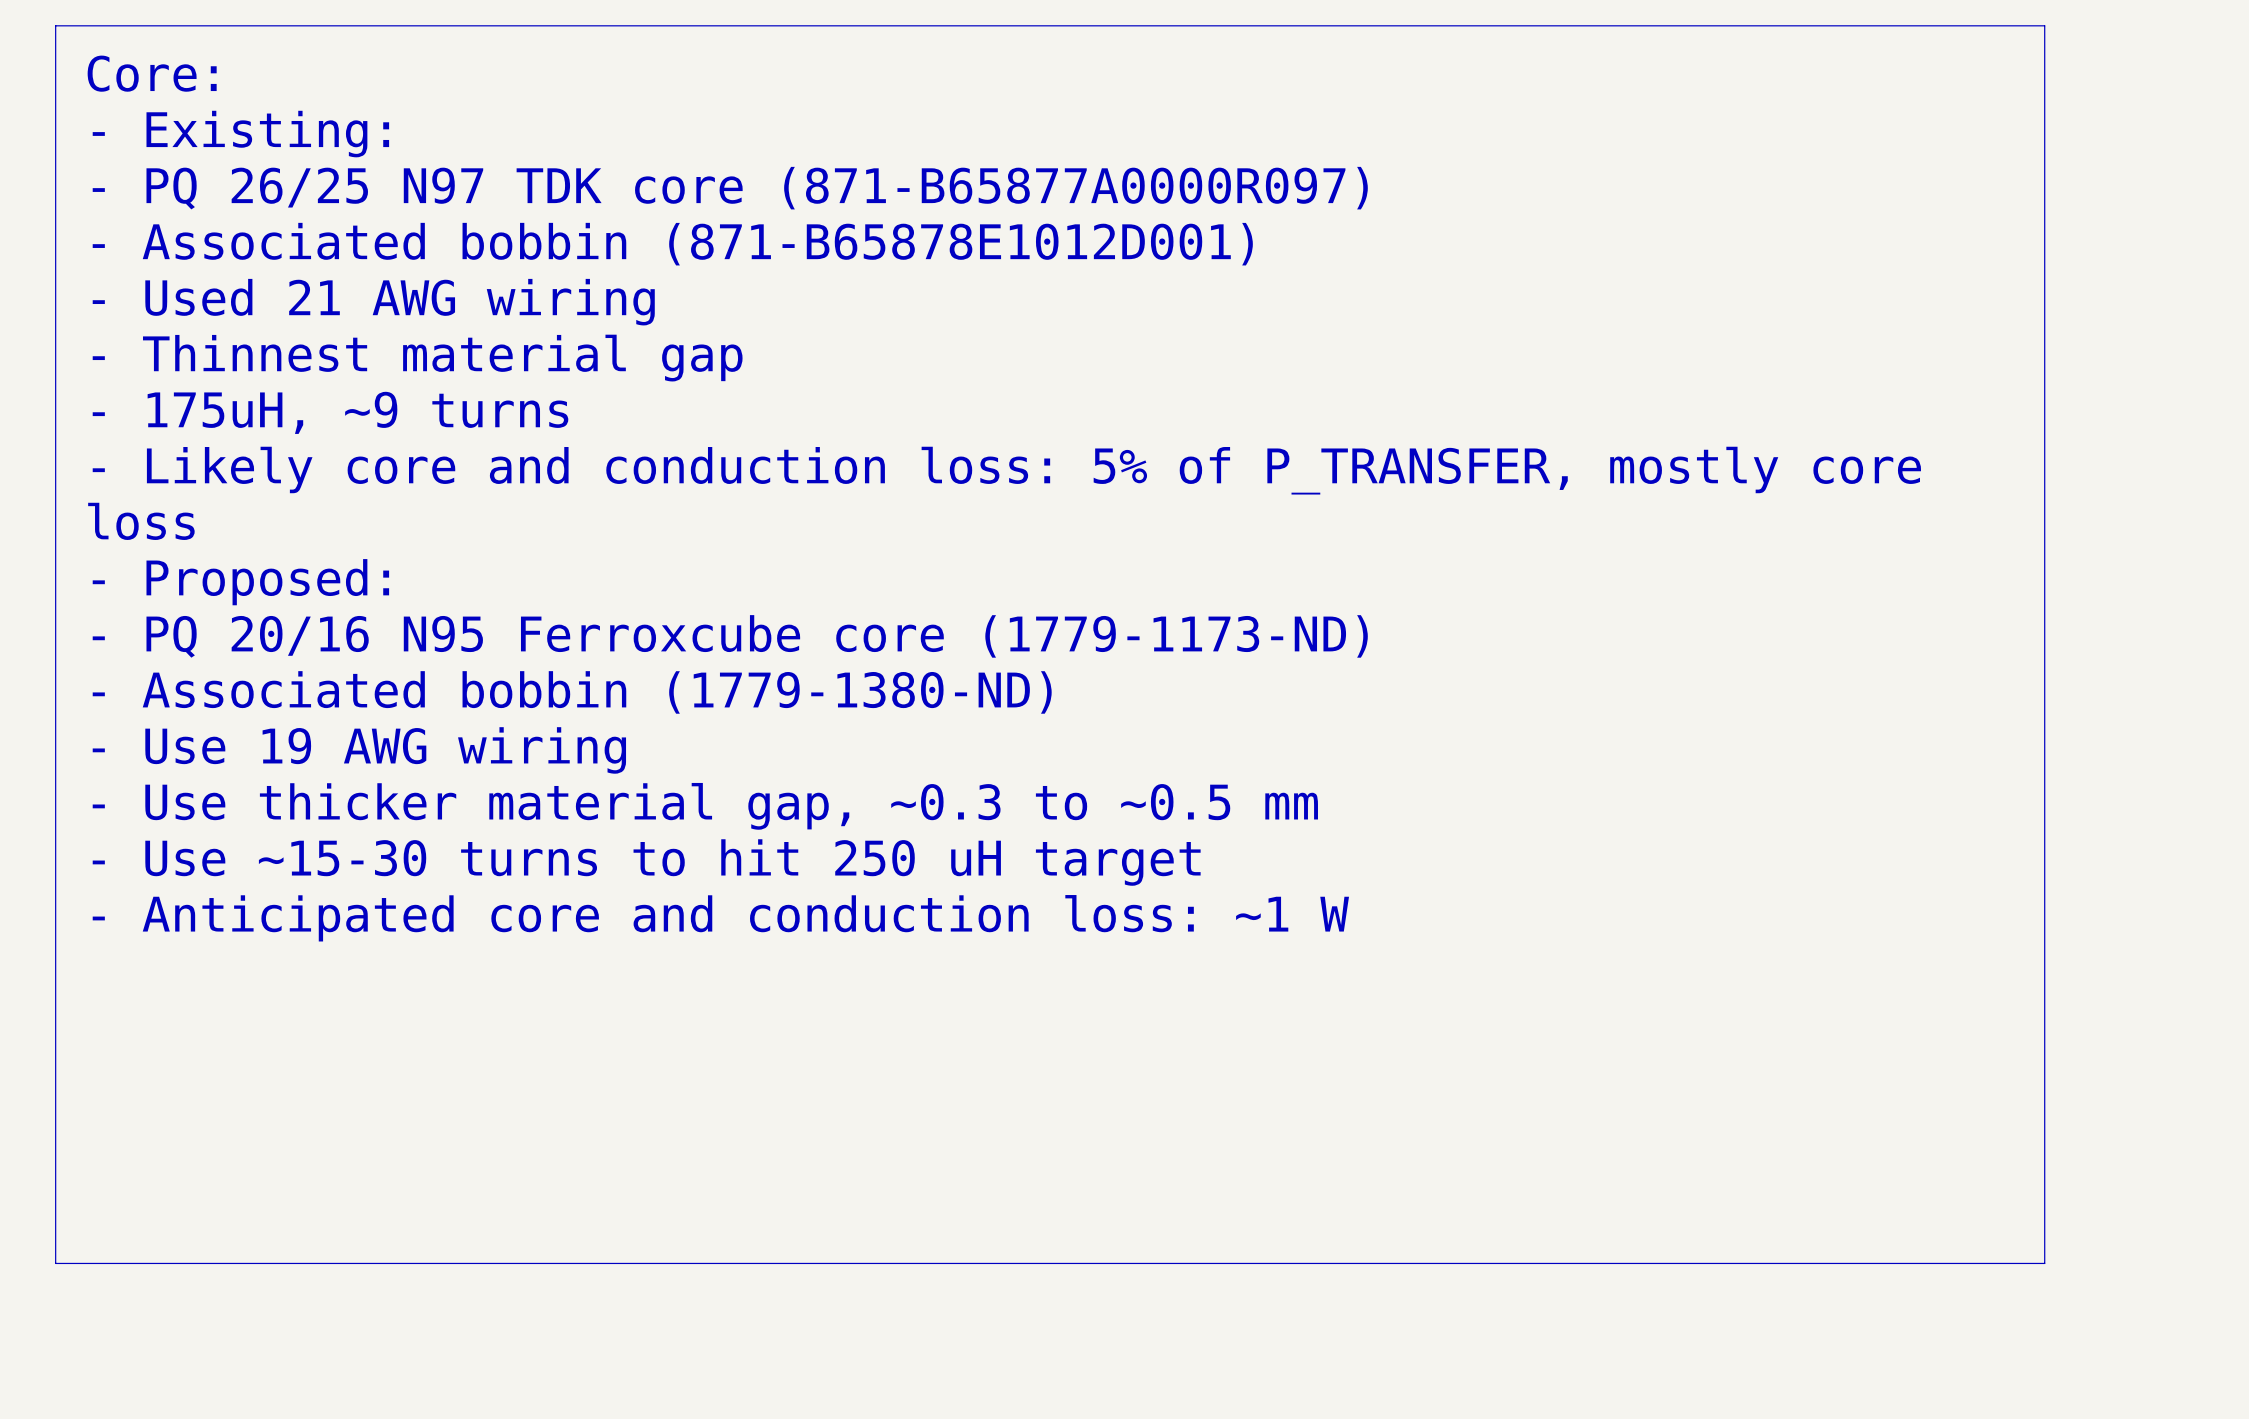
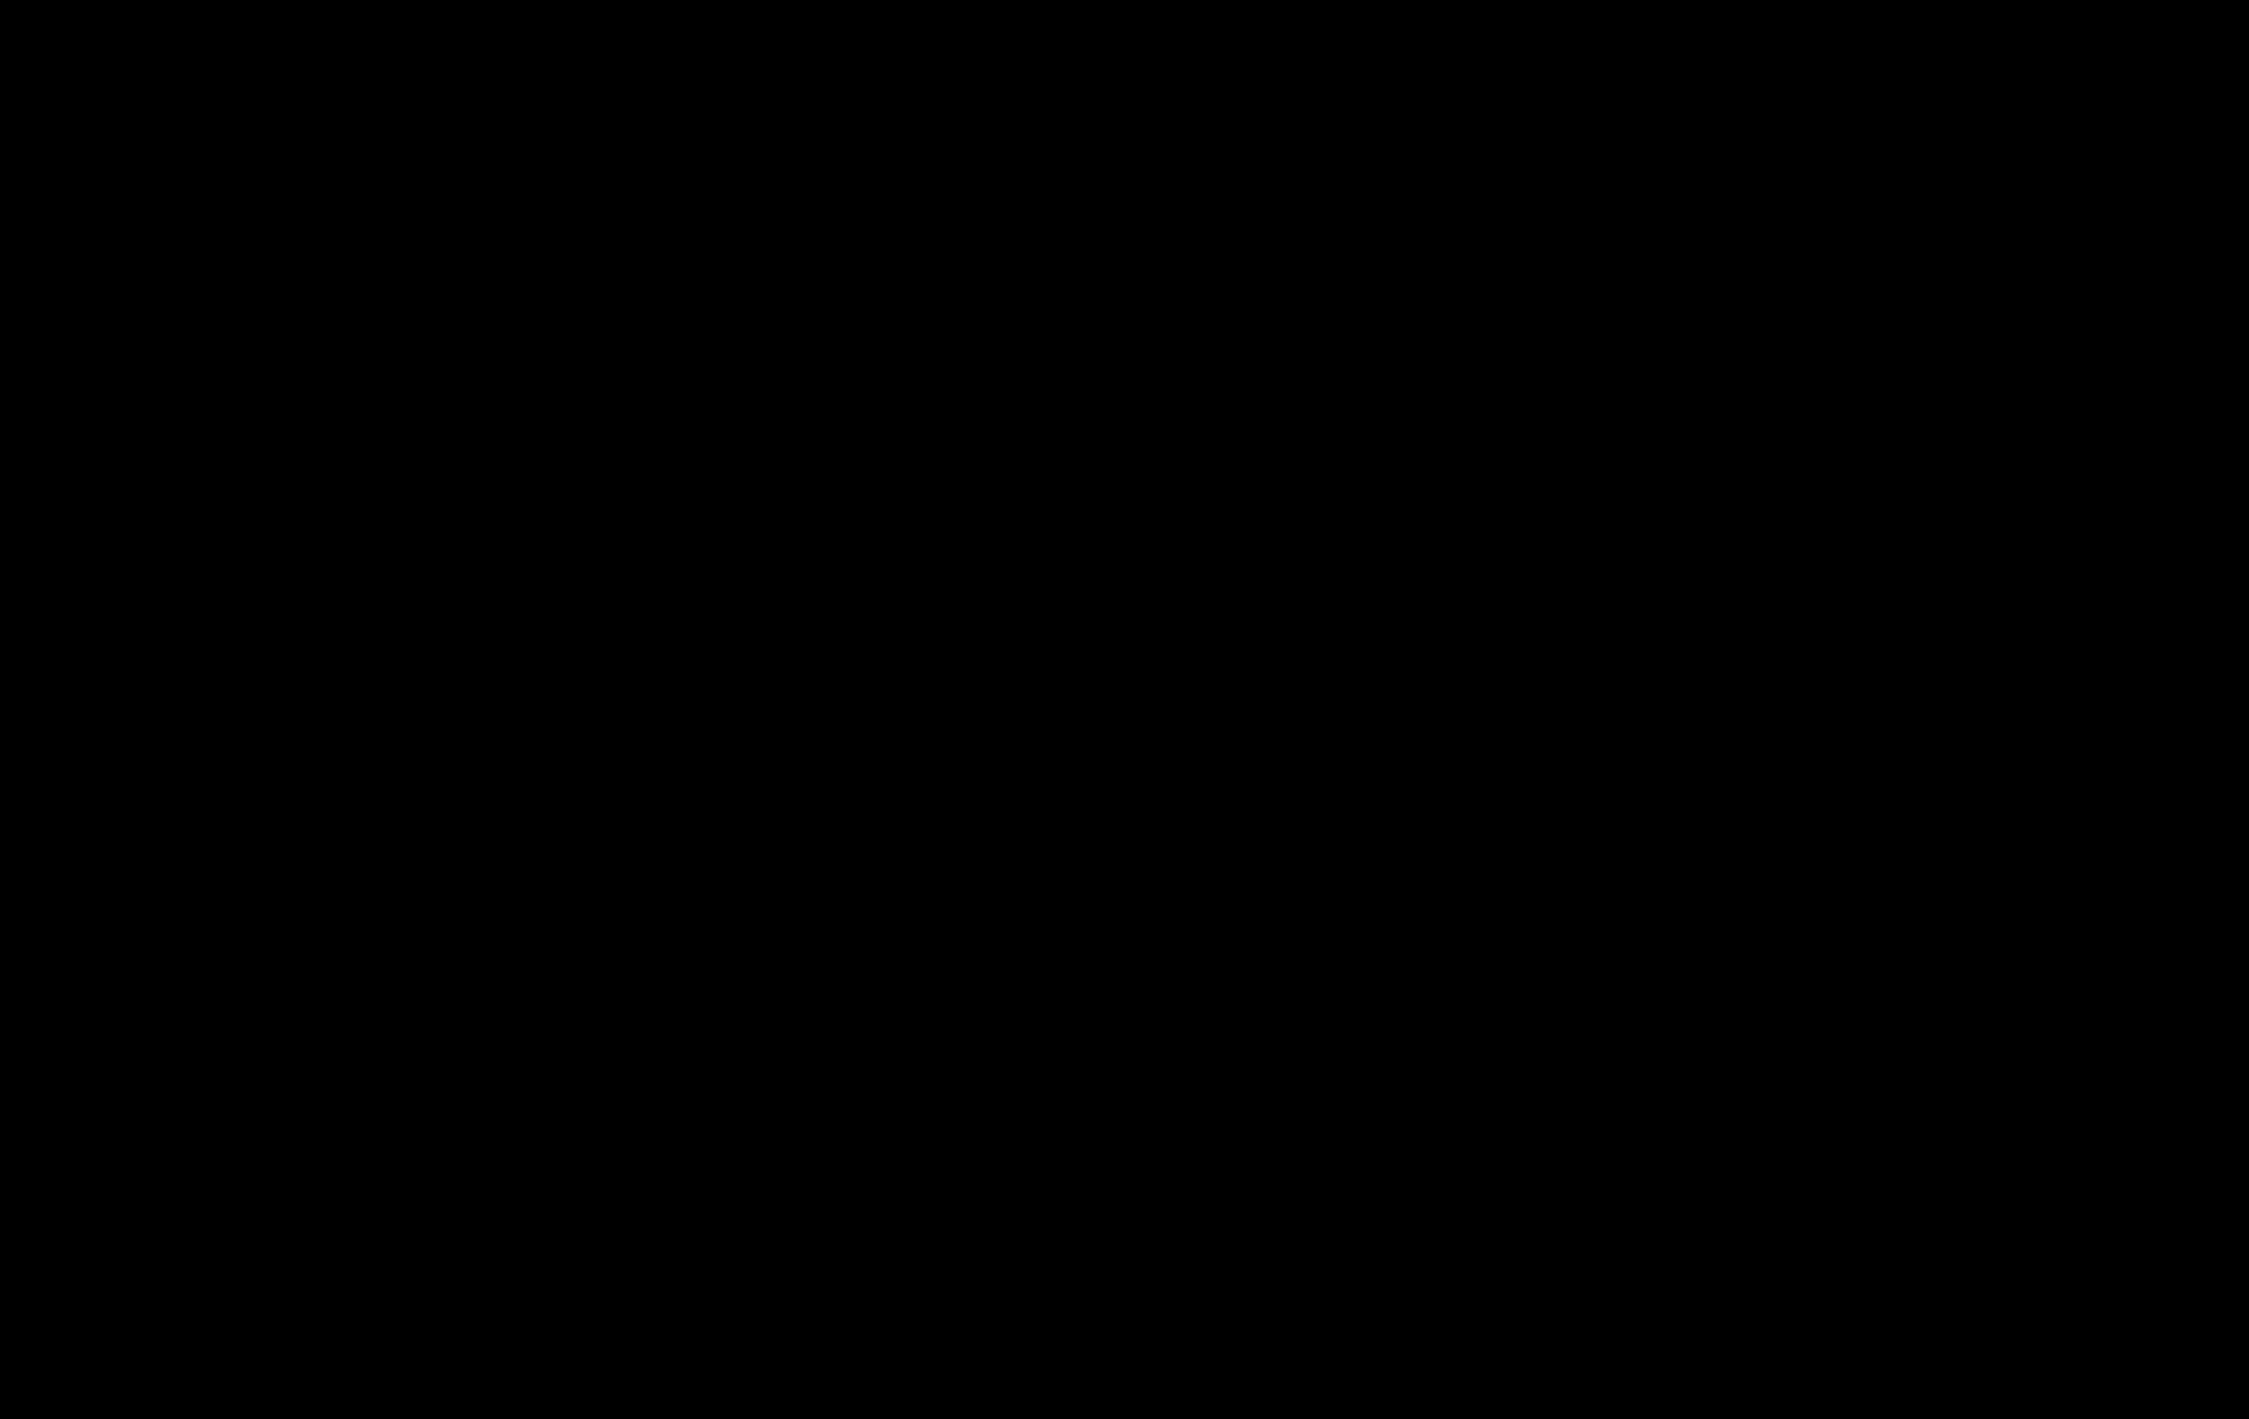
line: (55, 25) (2044, 25) (2044, 1263) (55, 1263) (55, 25) -> none
text: Core: (152, 73) -> none
text: - Existing: (240, 134) -> none
text: - PQ 26/25 N97 TDK core (871-B65877A0000R097) (730, 188) -> none
text: - Associated bobbin (871-B65878E1012D001) (672, 244) -> none
text: - Used 21 AWG wiring (373, 302) -> none
text: - Thinnest material gap (417, 358) -> none
text: - 175uH, ~9 turns (330, 412) -> none
text: - Likely core and conduction loss: 5% of P_TRANSFER, mostly core (1006, 470) -> none
text: loss (141, 521) -> none
text: - Proposed: (240, 582) -> none
text: - PQ 20/16 N95 Ferroxcube core (1779-1173-ND) (730, 636) -> none
text: - Associated bobbin (1779-1380-ND) (572, 692) -> none
text: - Use 19 AWG wiring (359, 750) -> none
text: - Use thicker material gap, ~0.3 to ~0.5 mm (705, 806) -> none
text: - Use ~15-30 turns to hit 250 uH target (646, 862) -> none
text: - Anticipated core and conduction loss: ~1 W (720, 918) -> none

